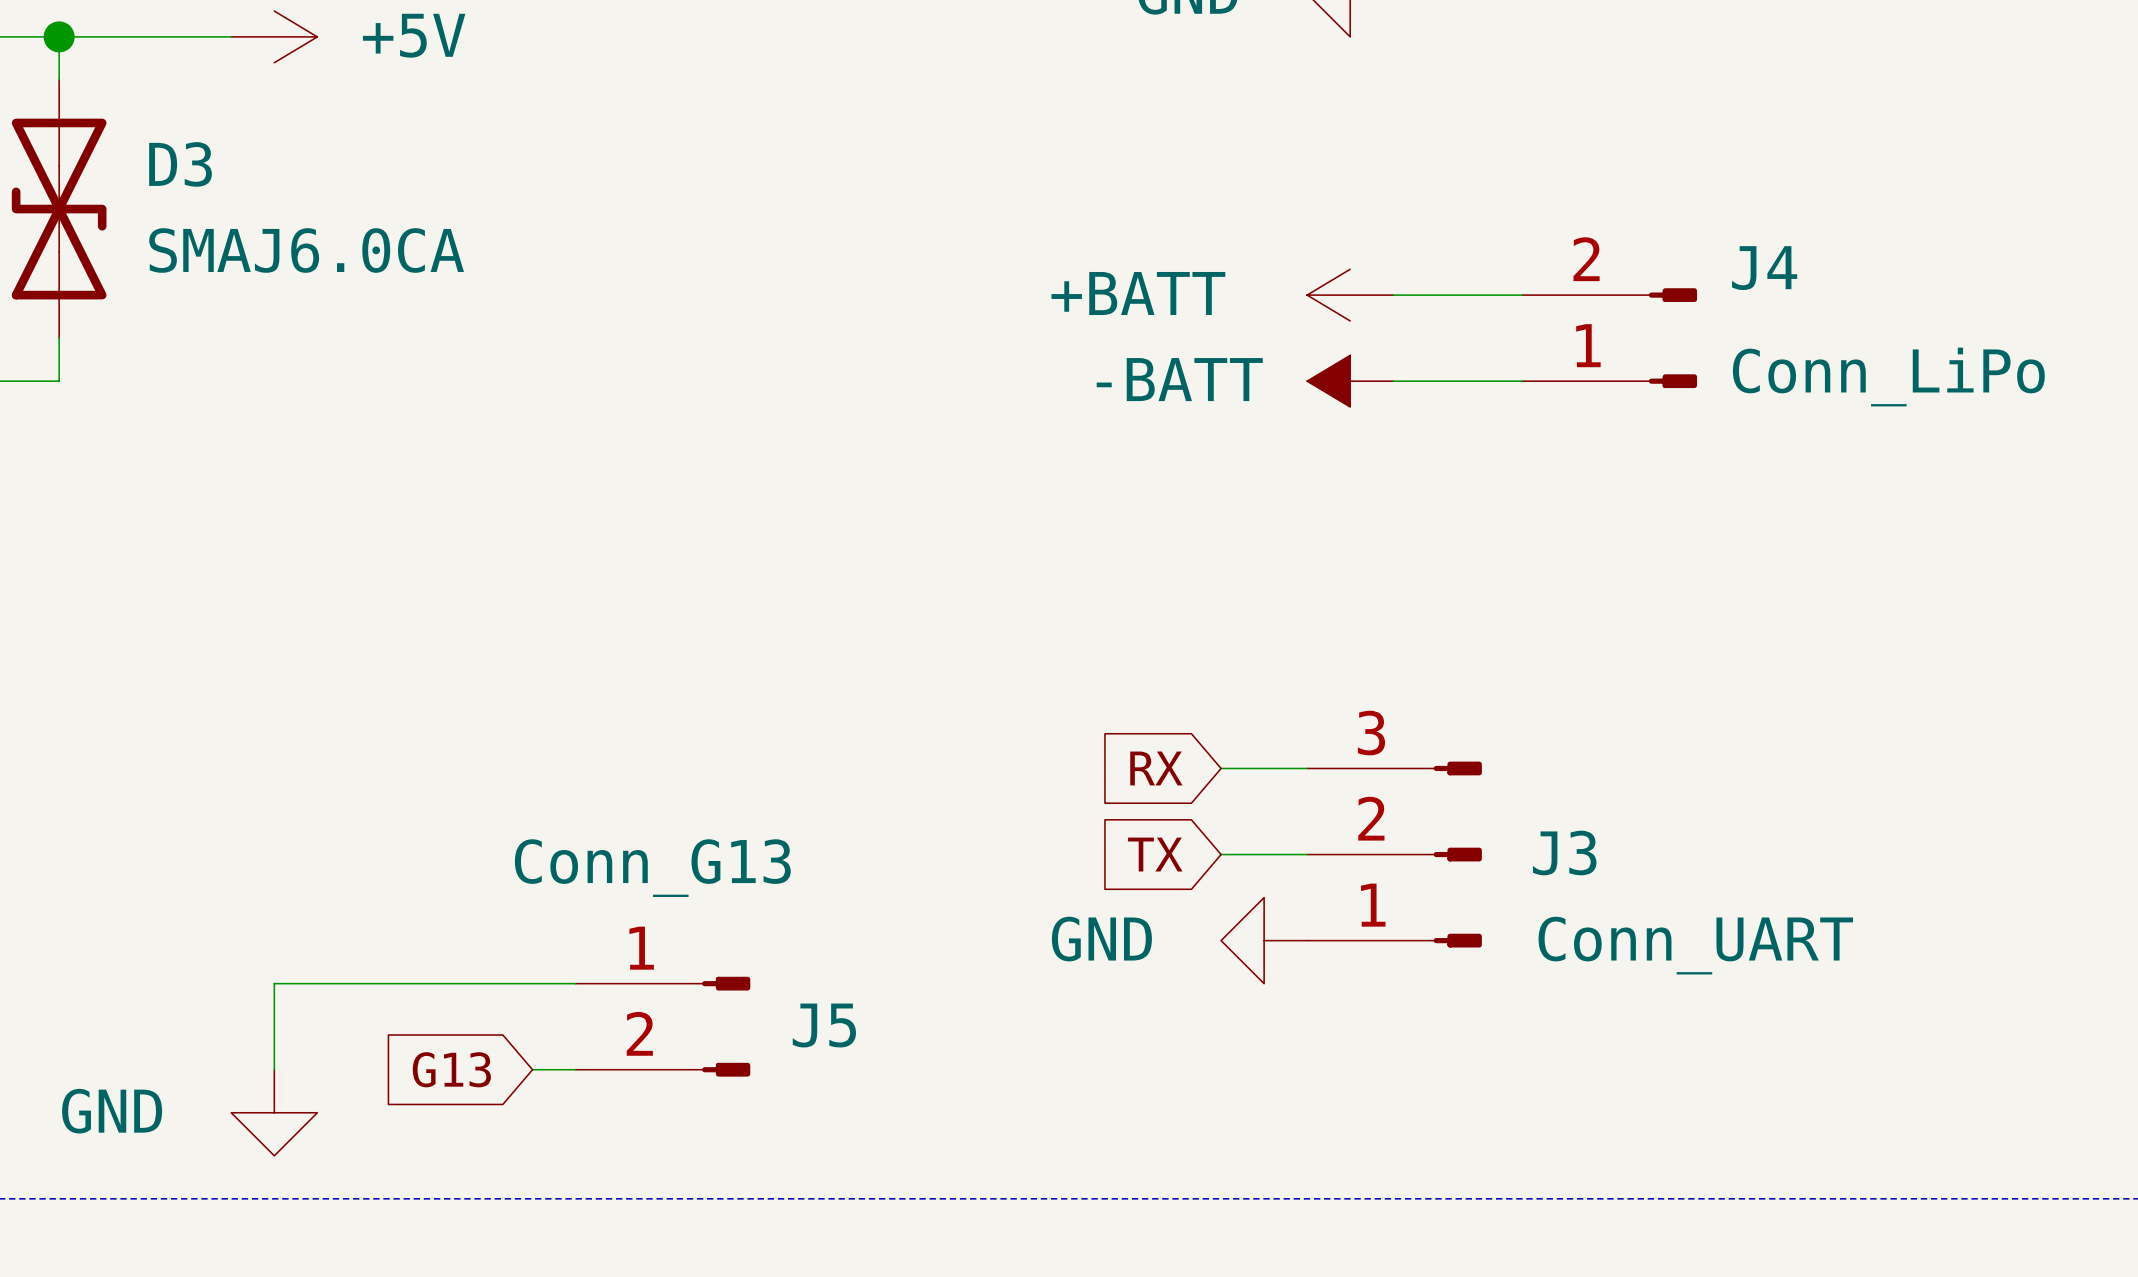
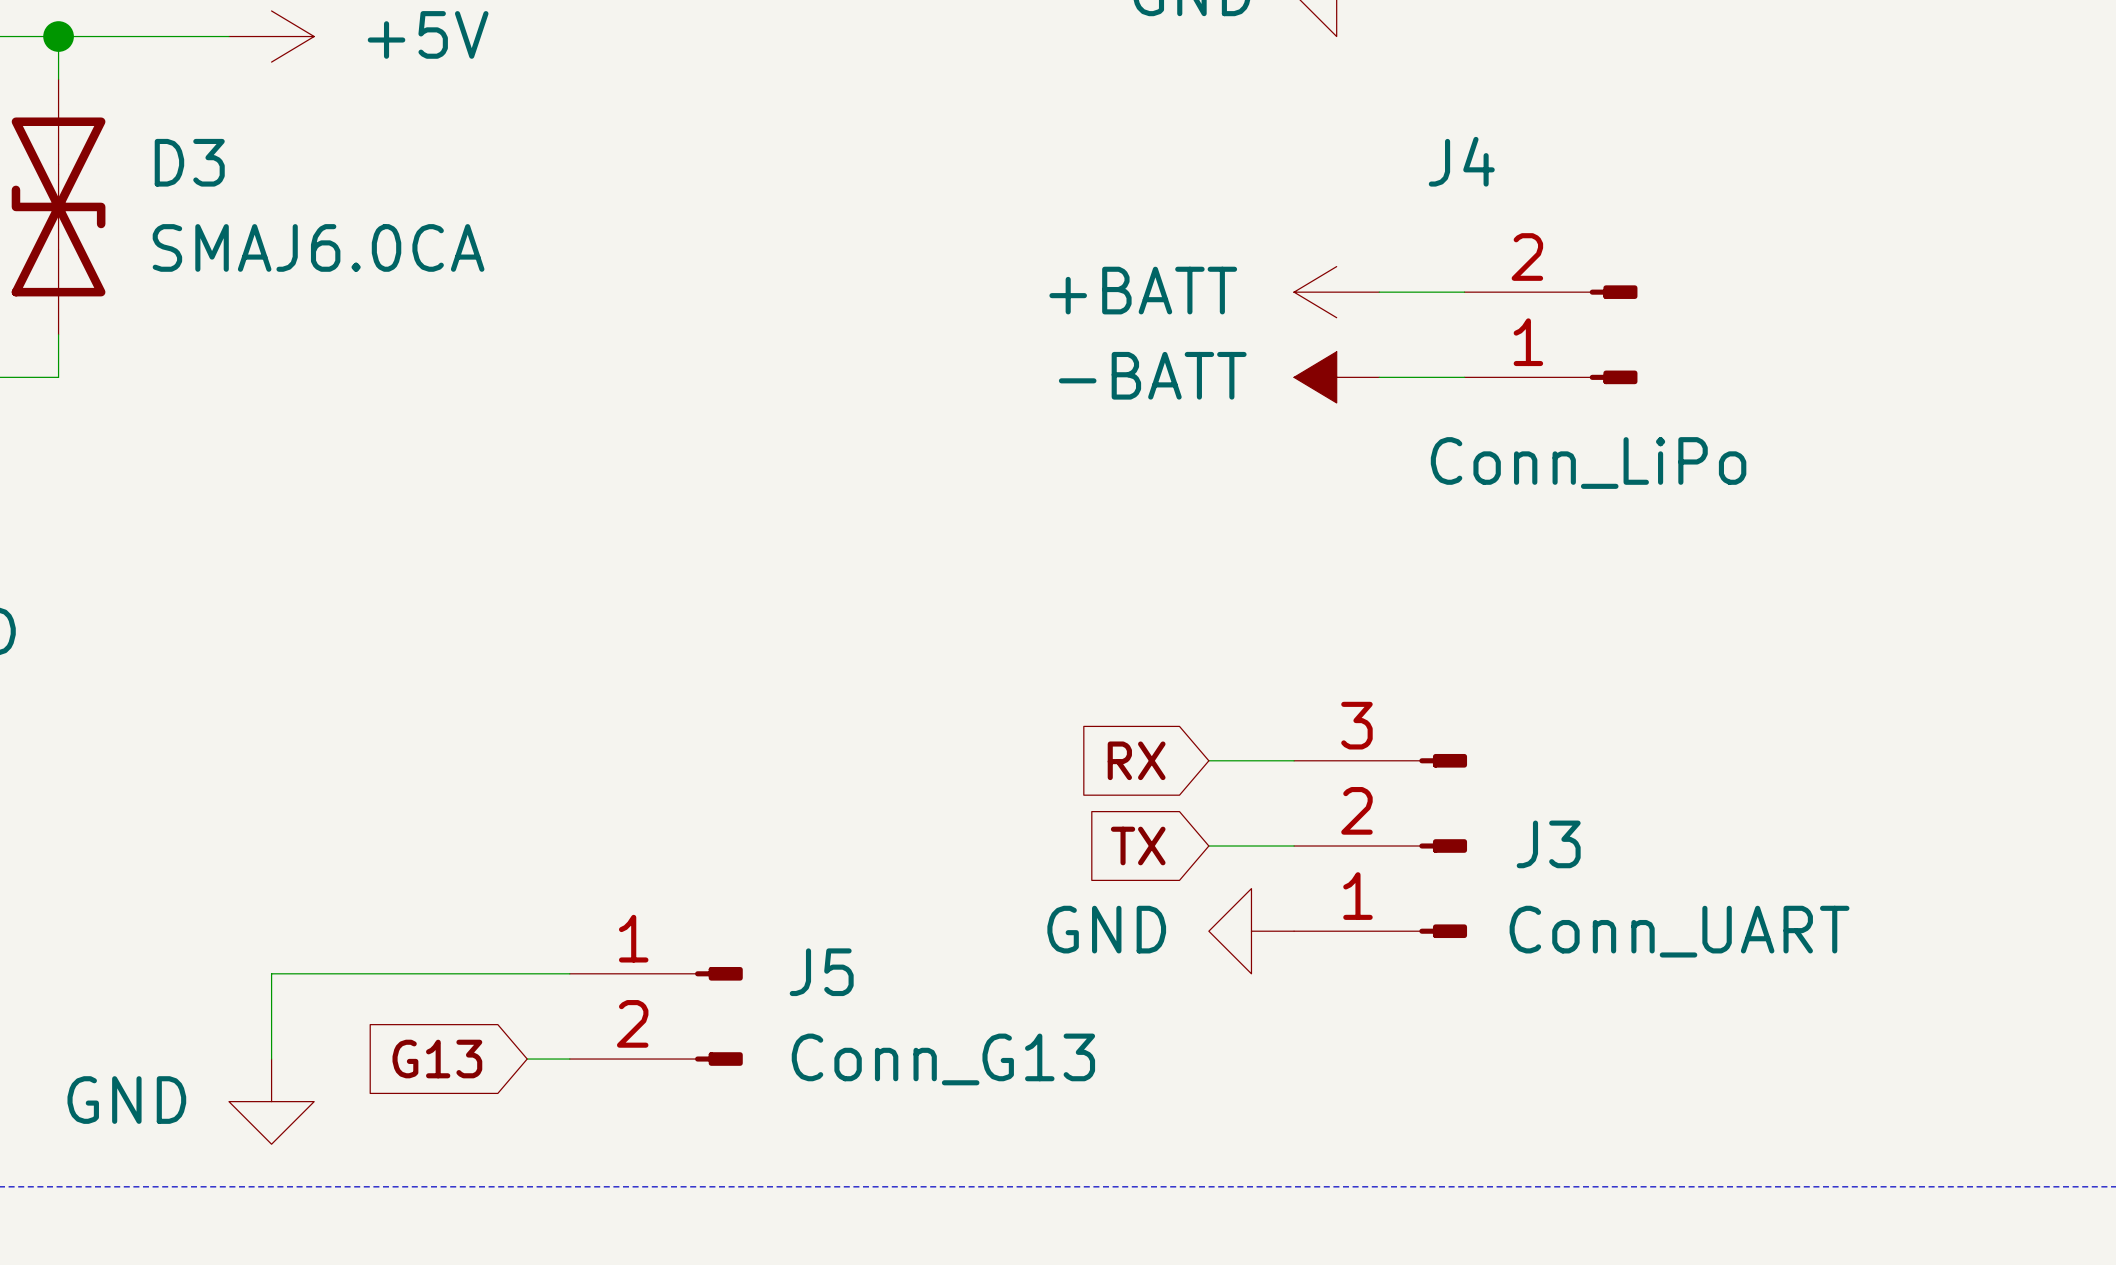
J4 name position: J4 (1764, 268) -> J4 (1461, 161)
J4 position: (1609, 338) -> (1550, 334)
J4 value position: Conn_LiPo (1888, 377) -> Conn_LiPo (1588, 463)
J5 value position: Conn_G13 (652, 868) -> Conn_G13 (943, 1059)
J5 name position: J5 (824, 1025) -> J5 (821, 972)

